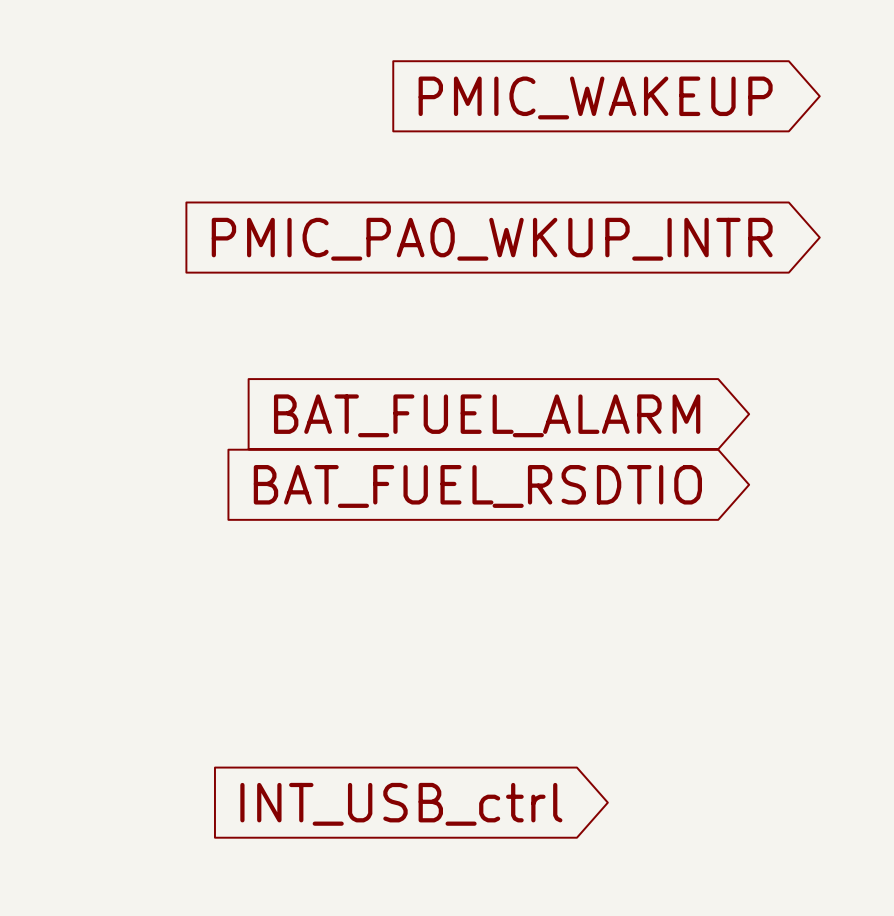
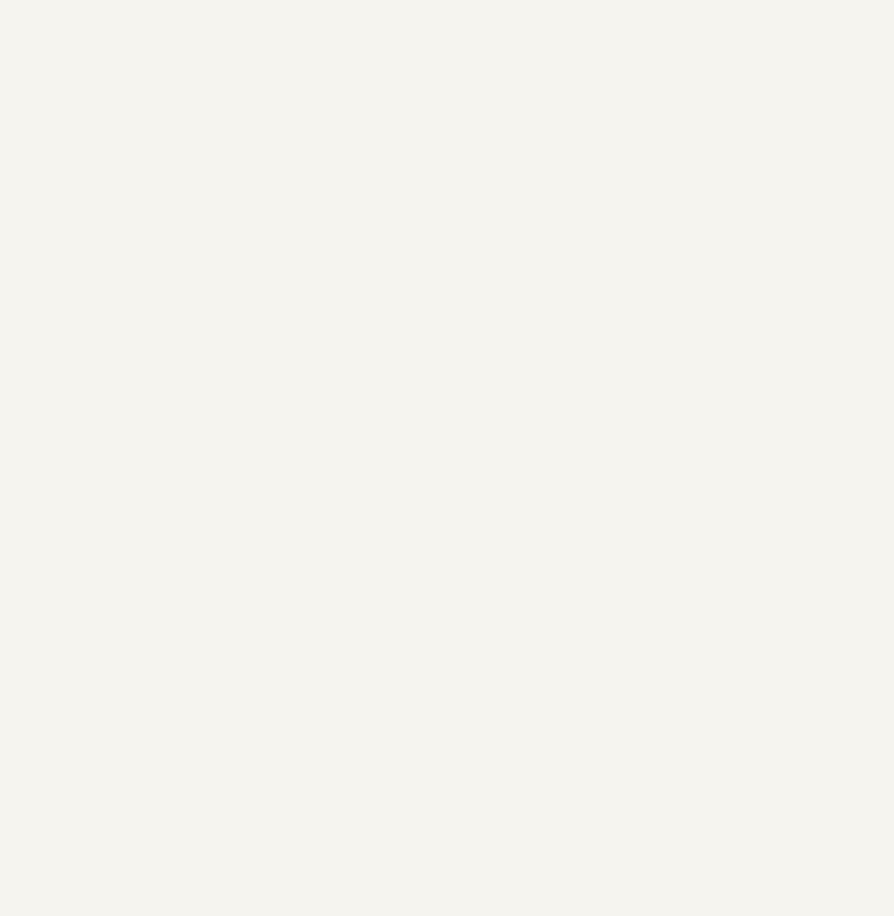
global label: PMIC_WAKEUP (595, 97) -> none
global label: PMIC_PA0_WKUP_INTR (492, 239) -> none
global label: BAT_FUEL_ALARM (487, 415) -> none
global label: BAT_FUEL_RSDTIO (477, 486) -> none
global label: INT_USB_ctrl (401, 804) -> none

